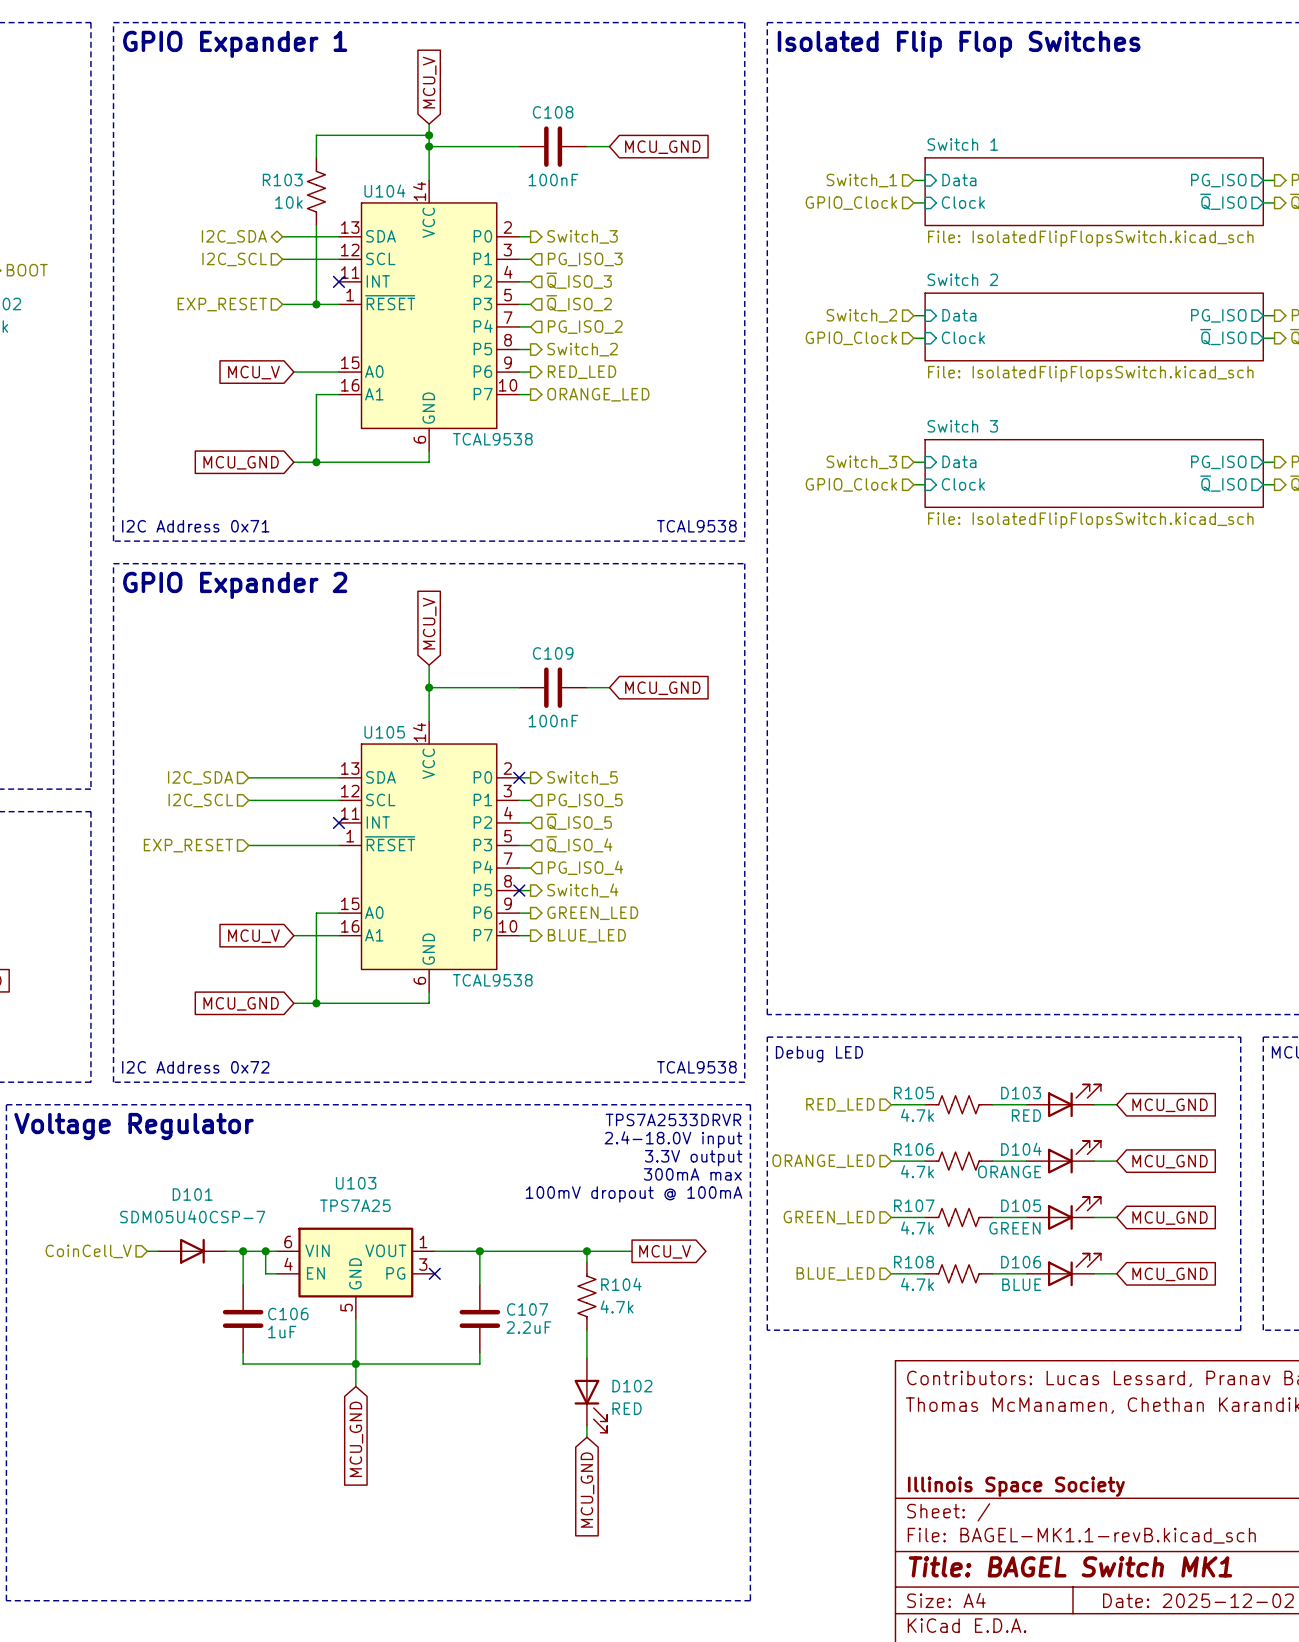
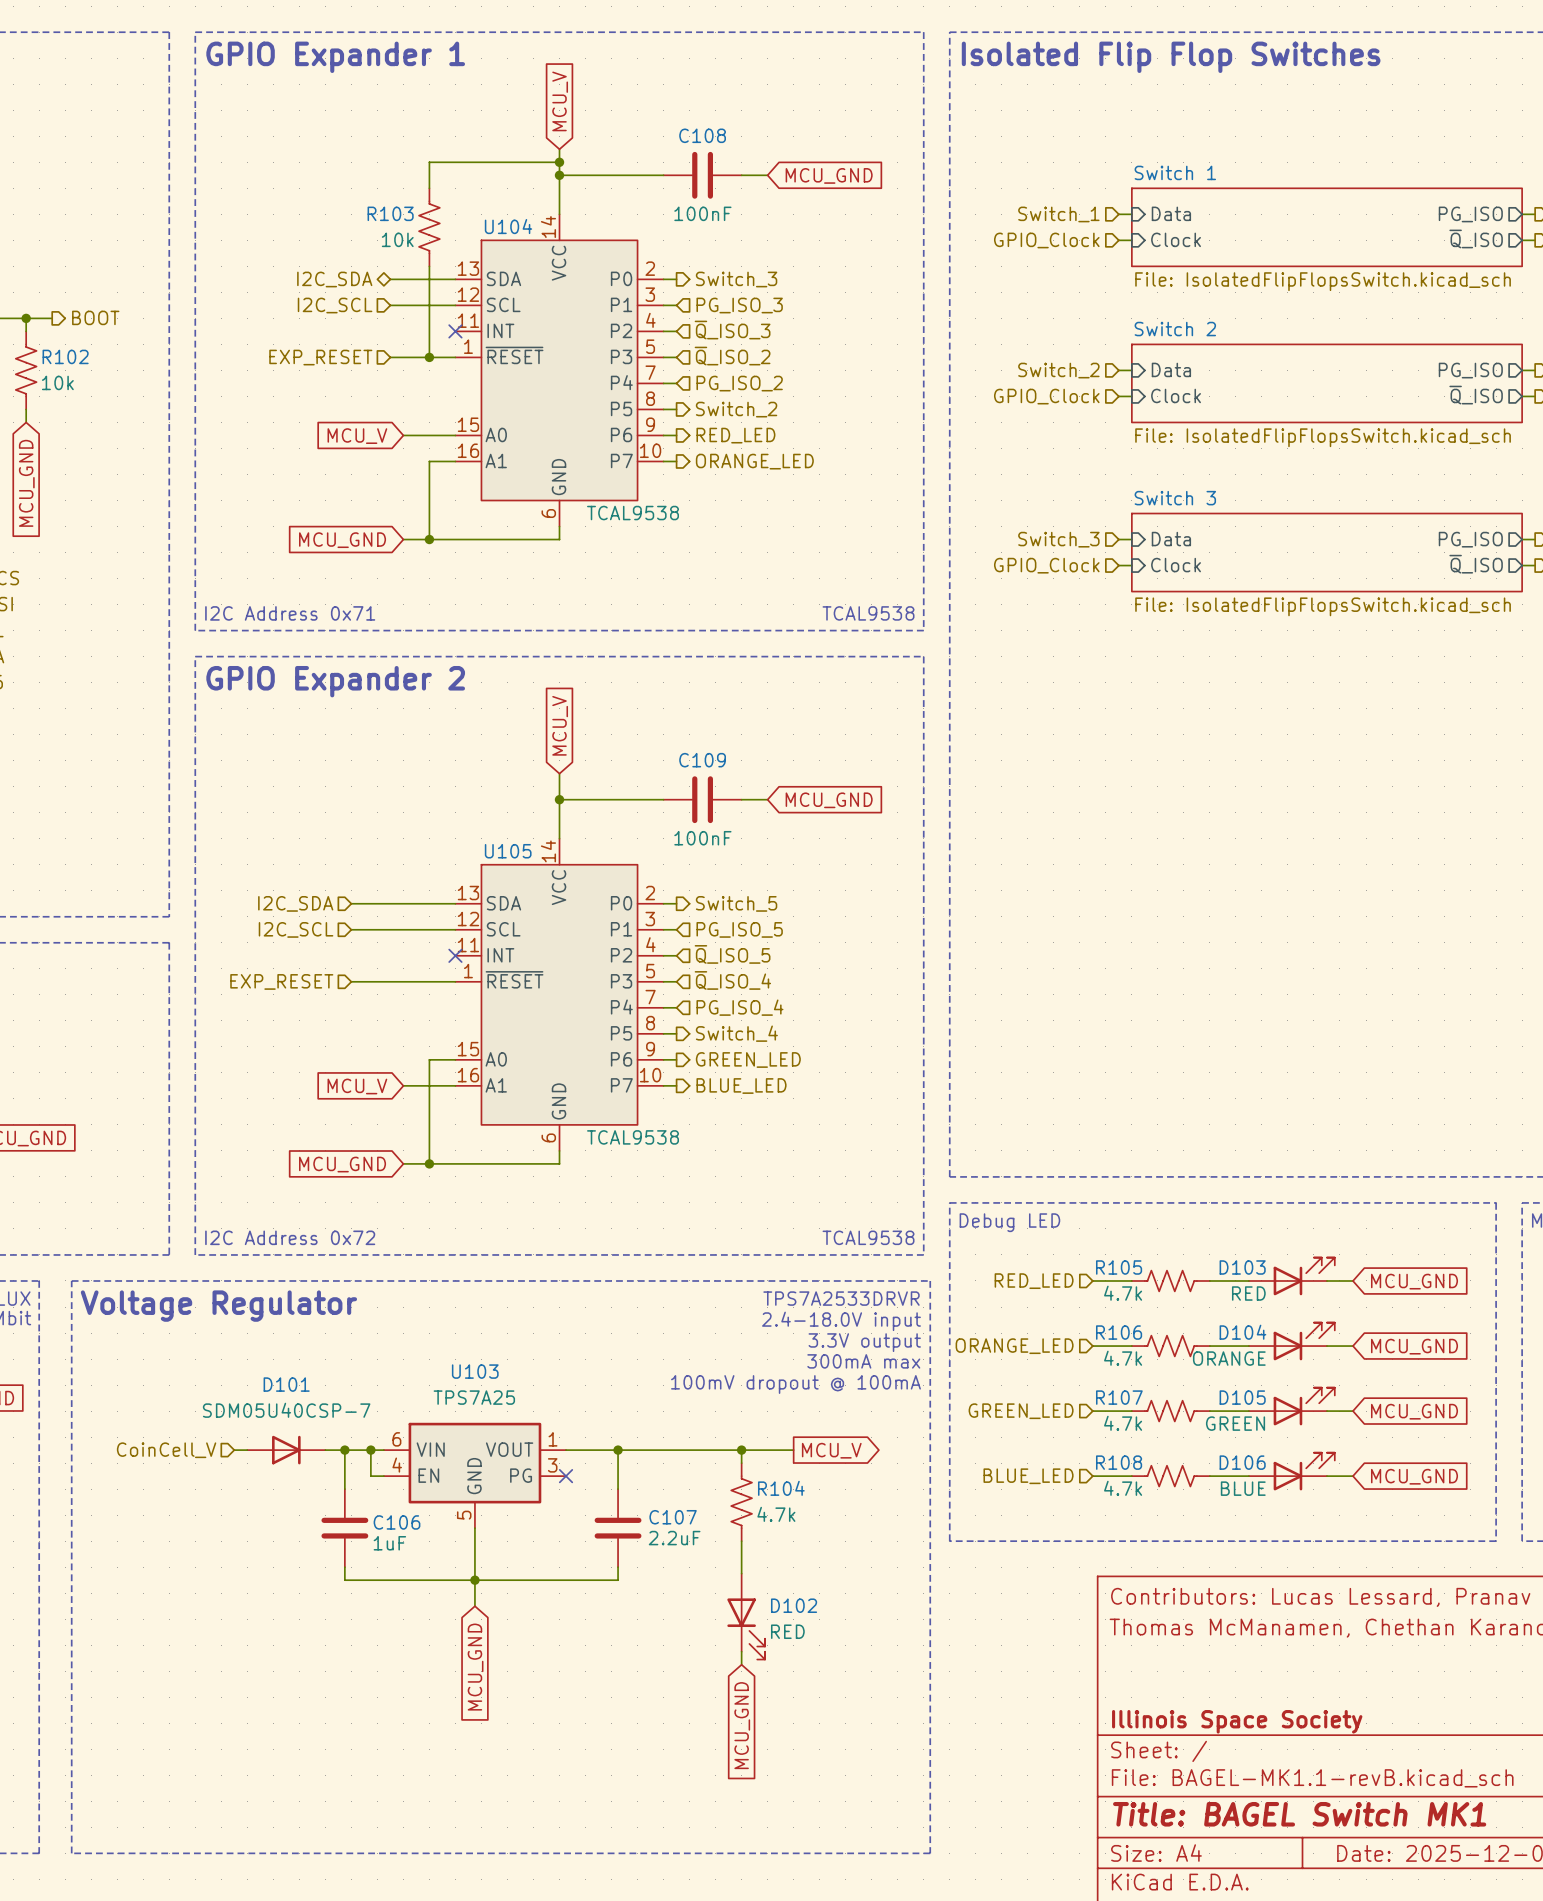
no-connect mark: (519, 777) -> none
no-connect mark: (519, 890) -> none

